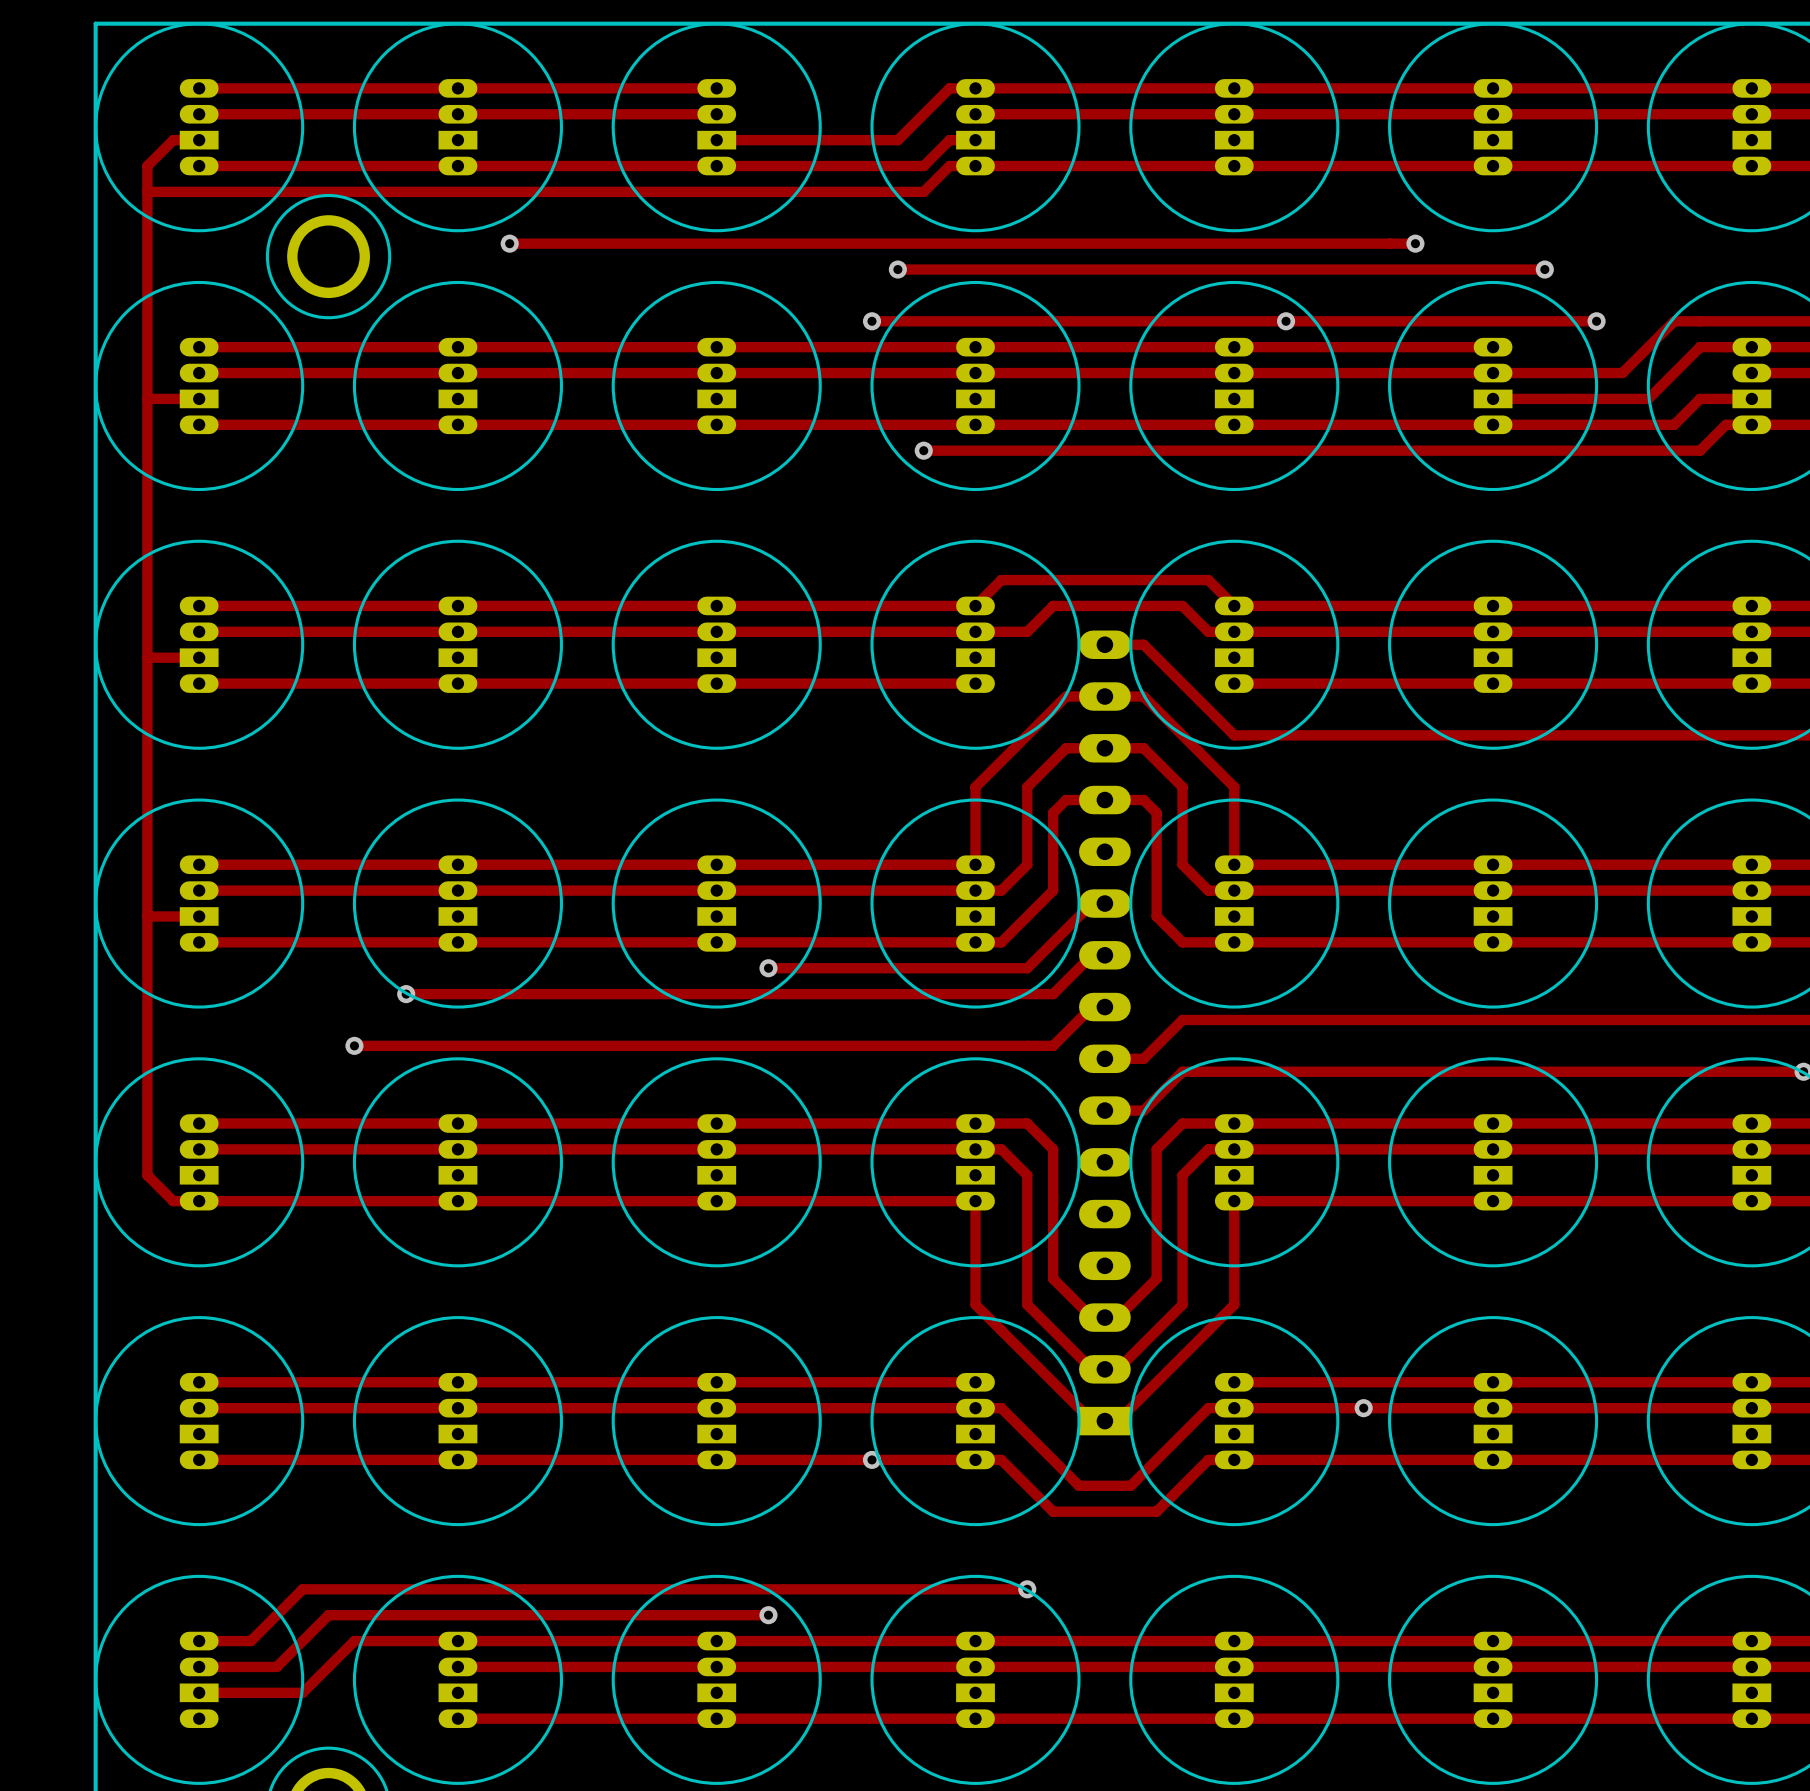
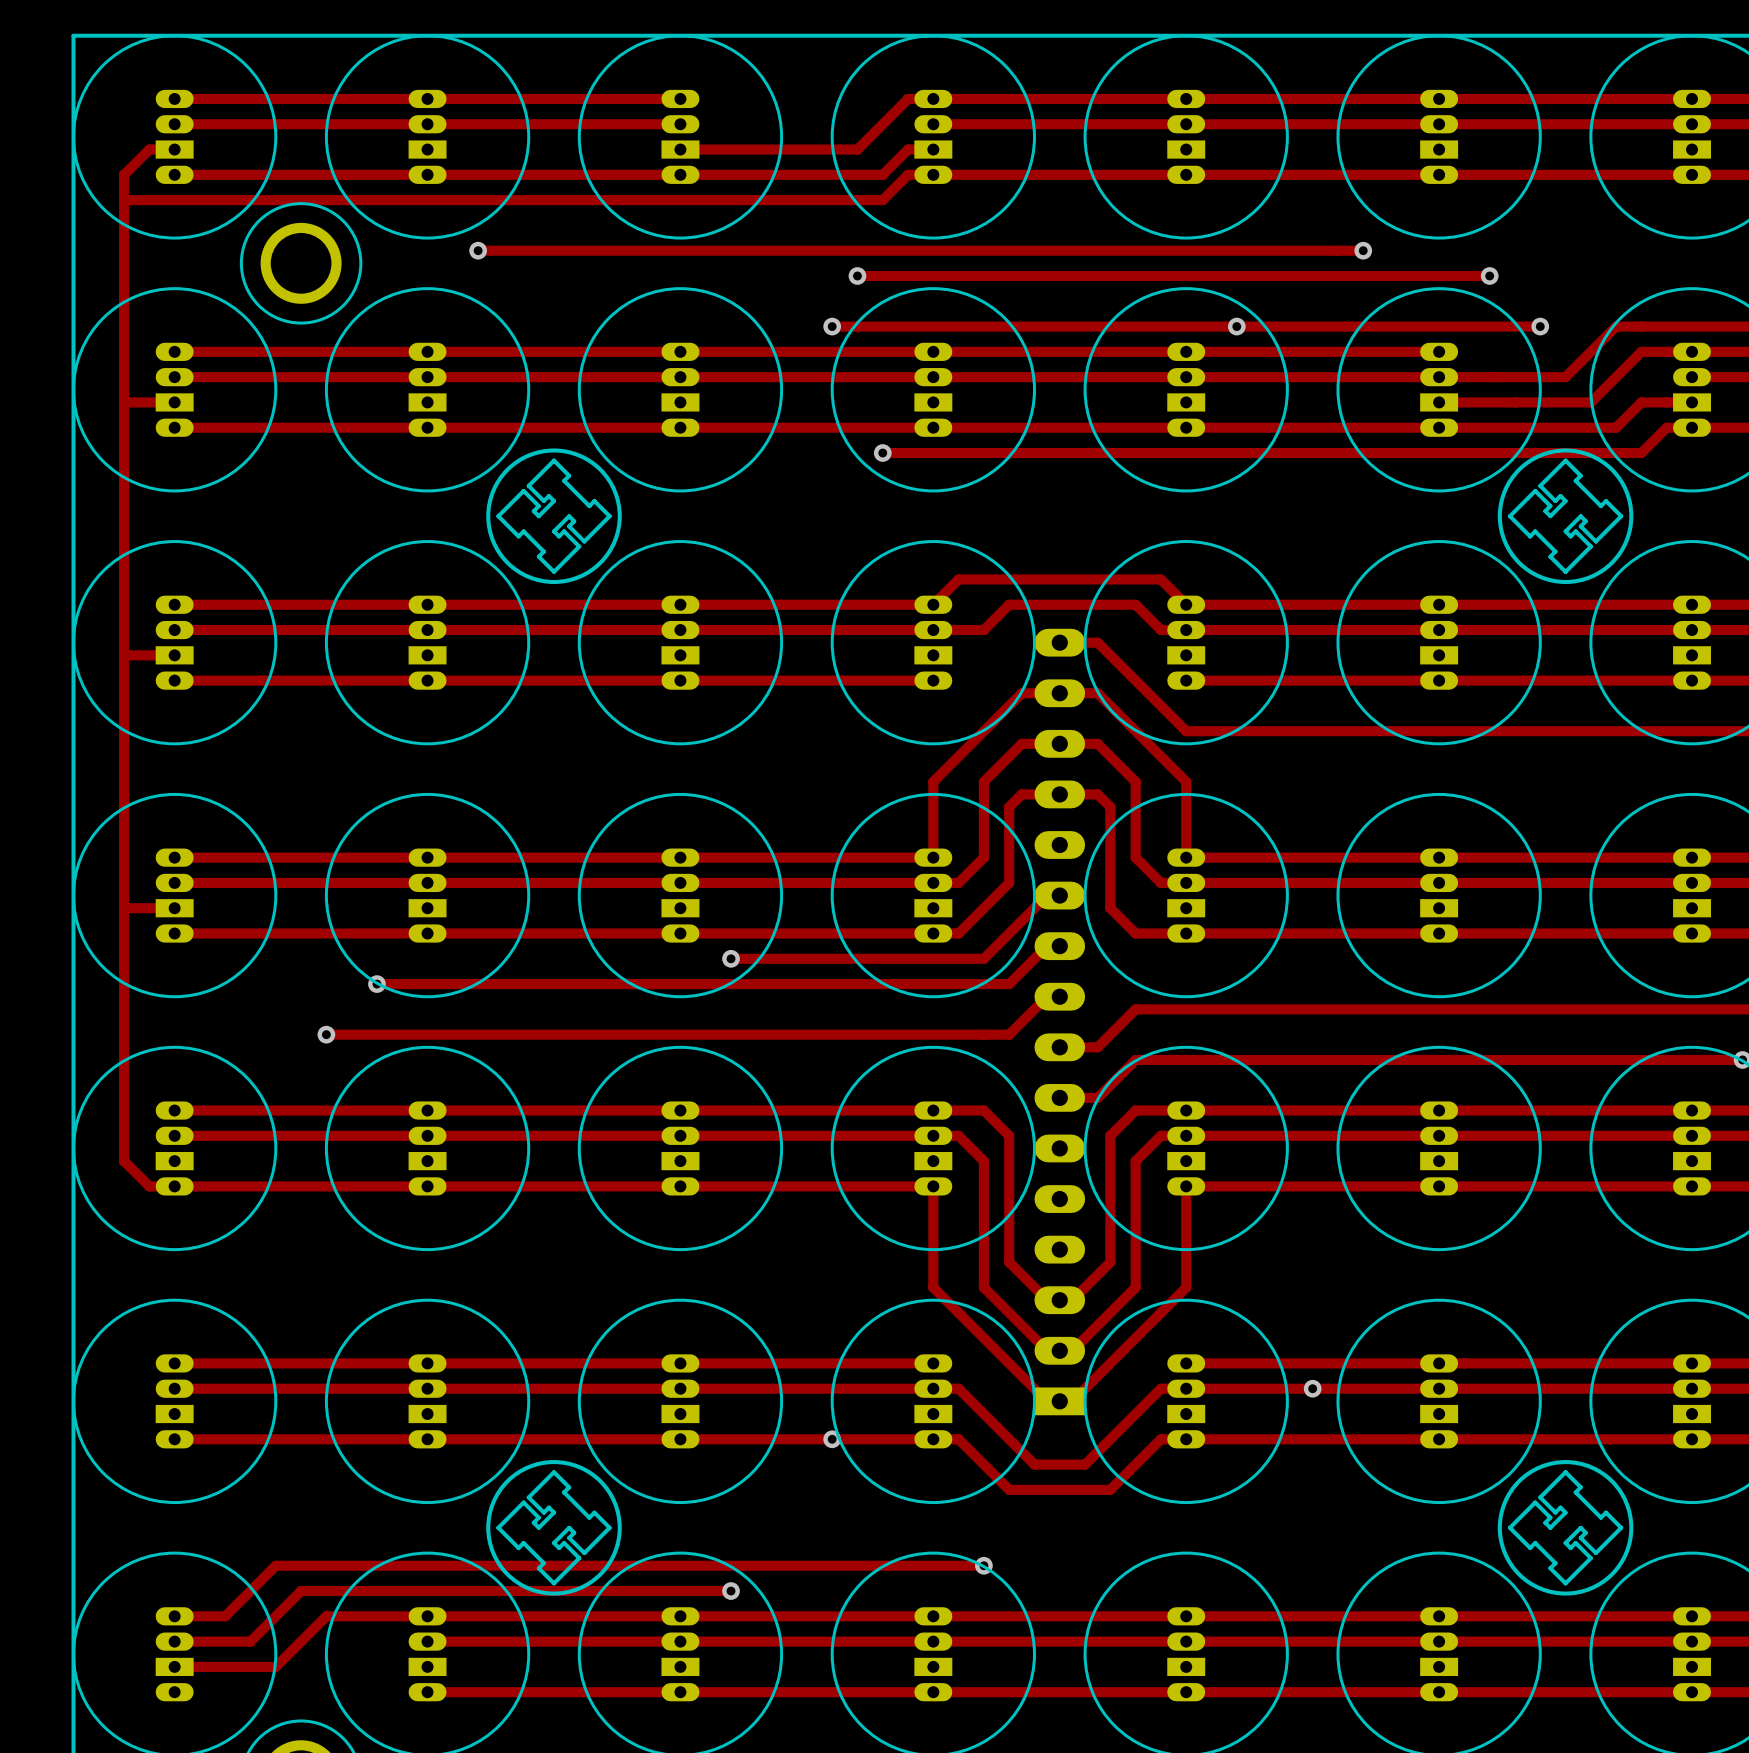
drawing: none -> [486, 448, 622, 585]
drawing: none -> [1497, 448, 1634, 585]
drawing: none -> [486, 1460, 622, 1596]
drawing: none -> [1497, 1460, 1634, 1596]

